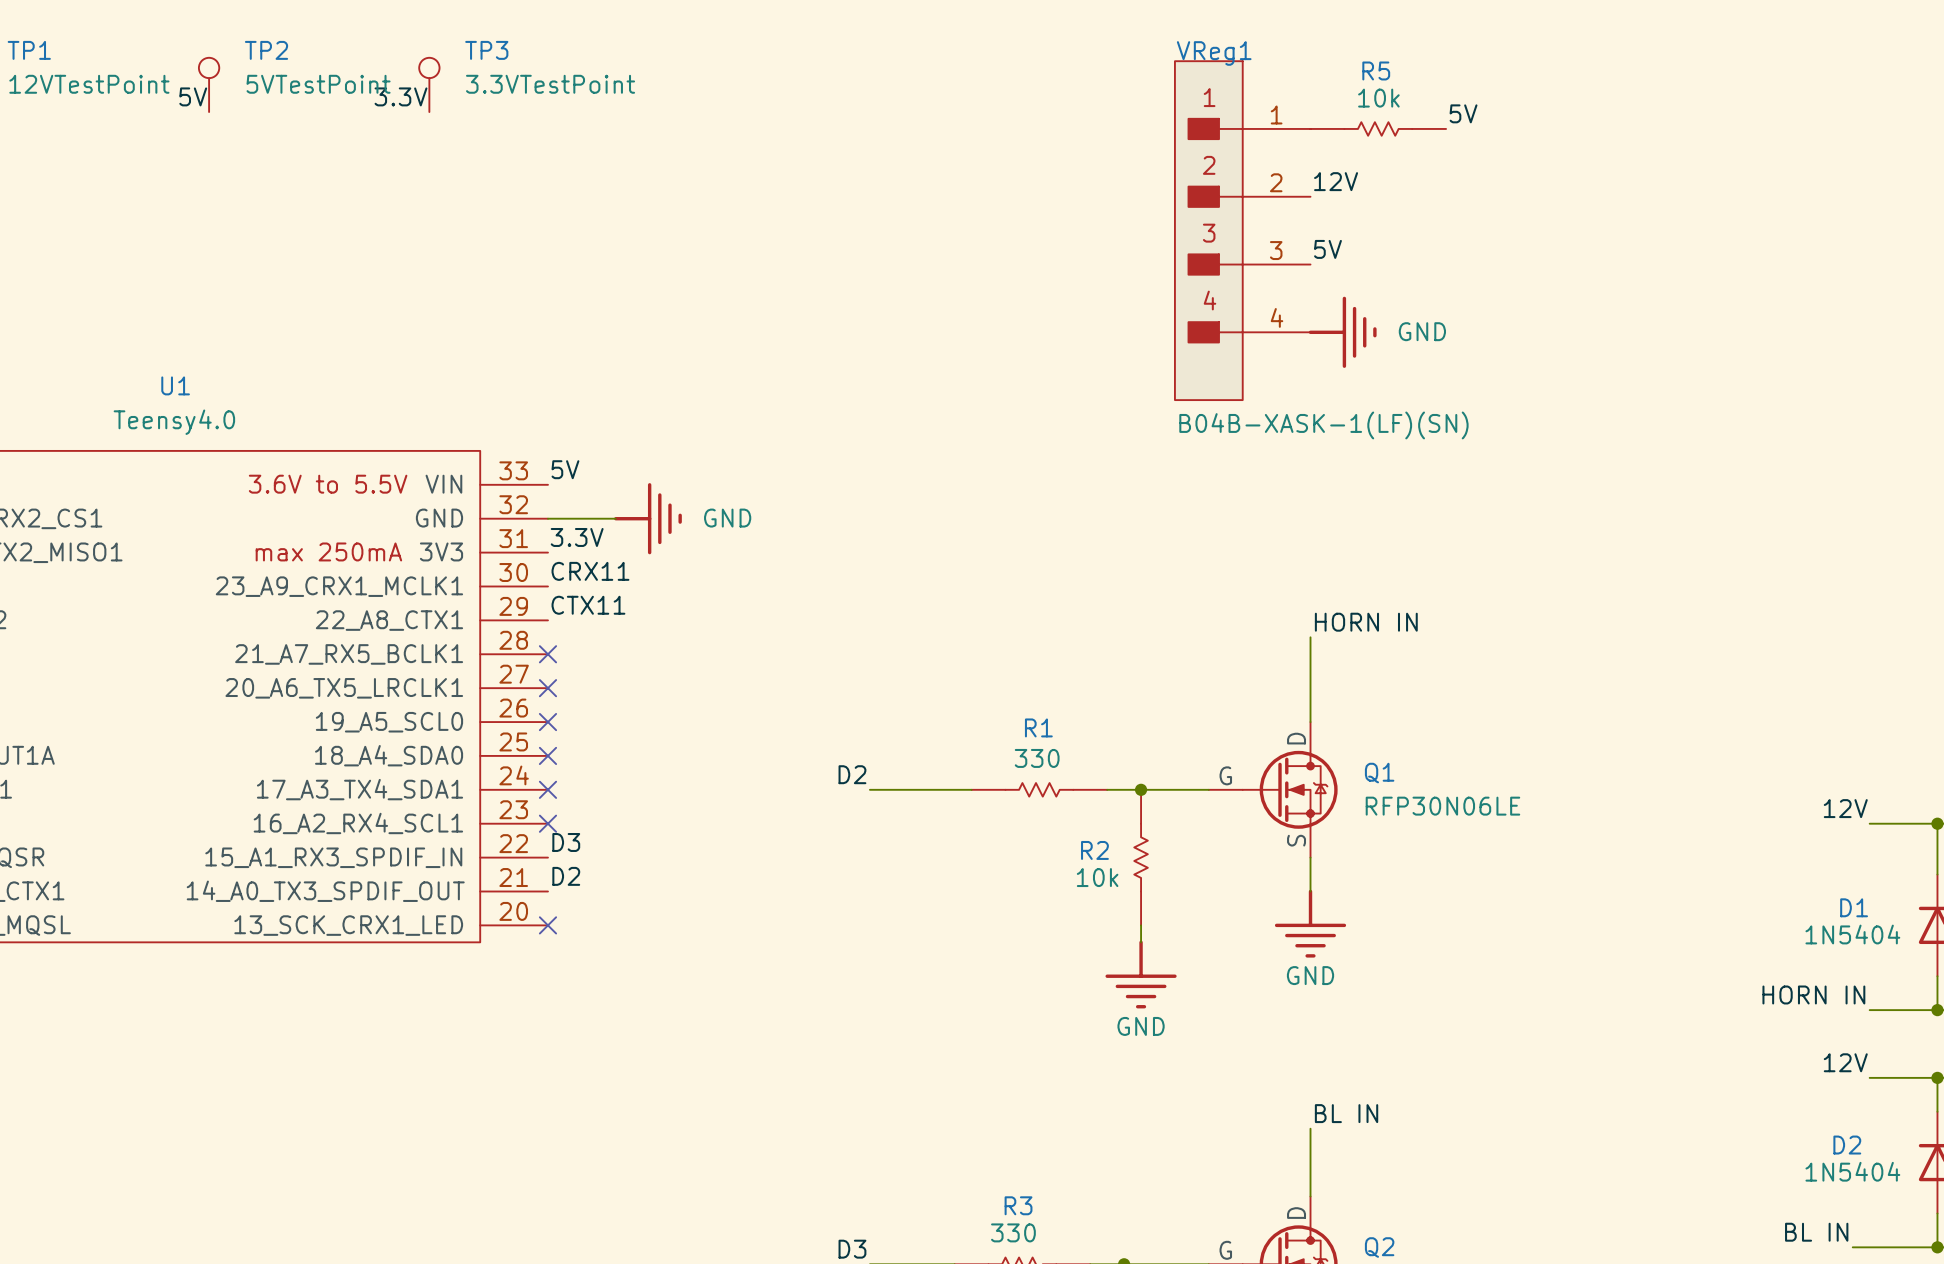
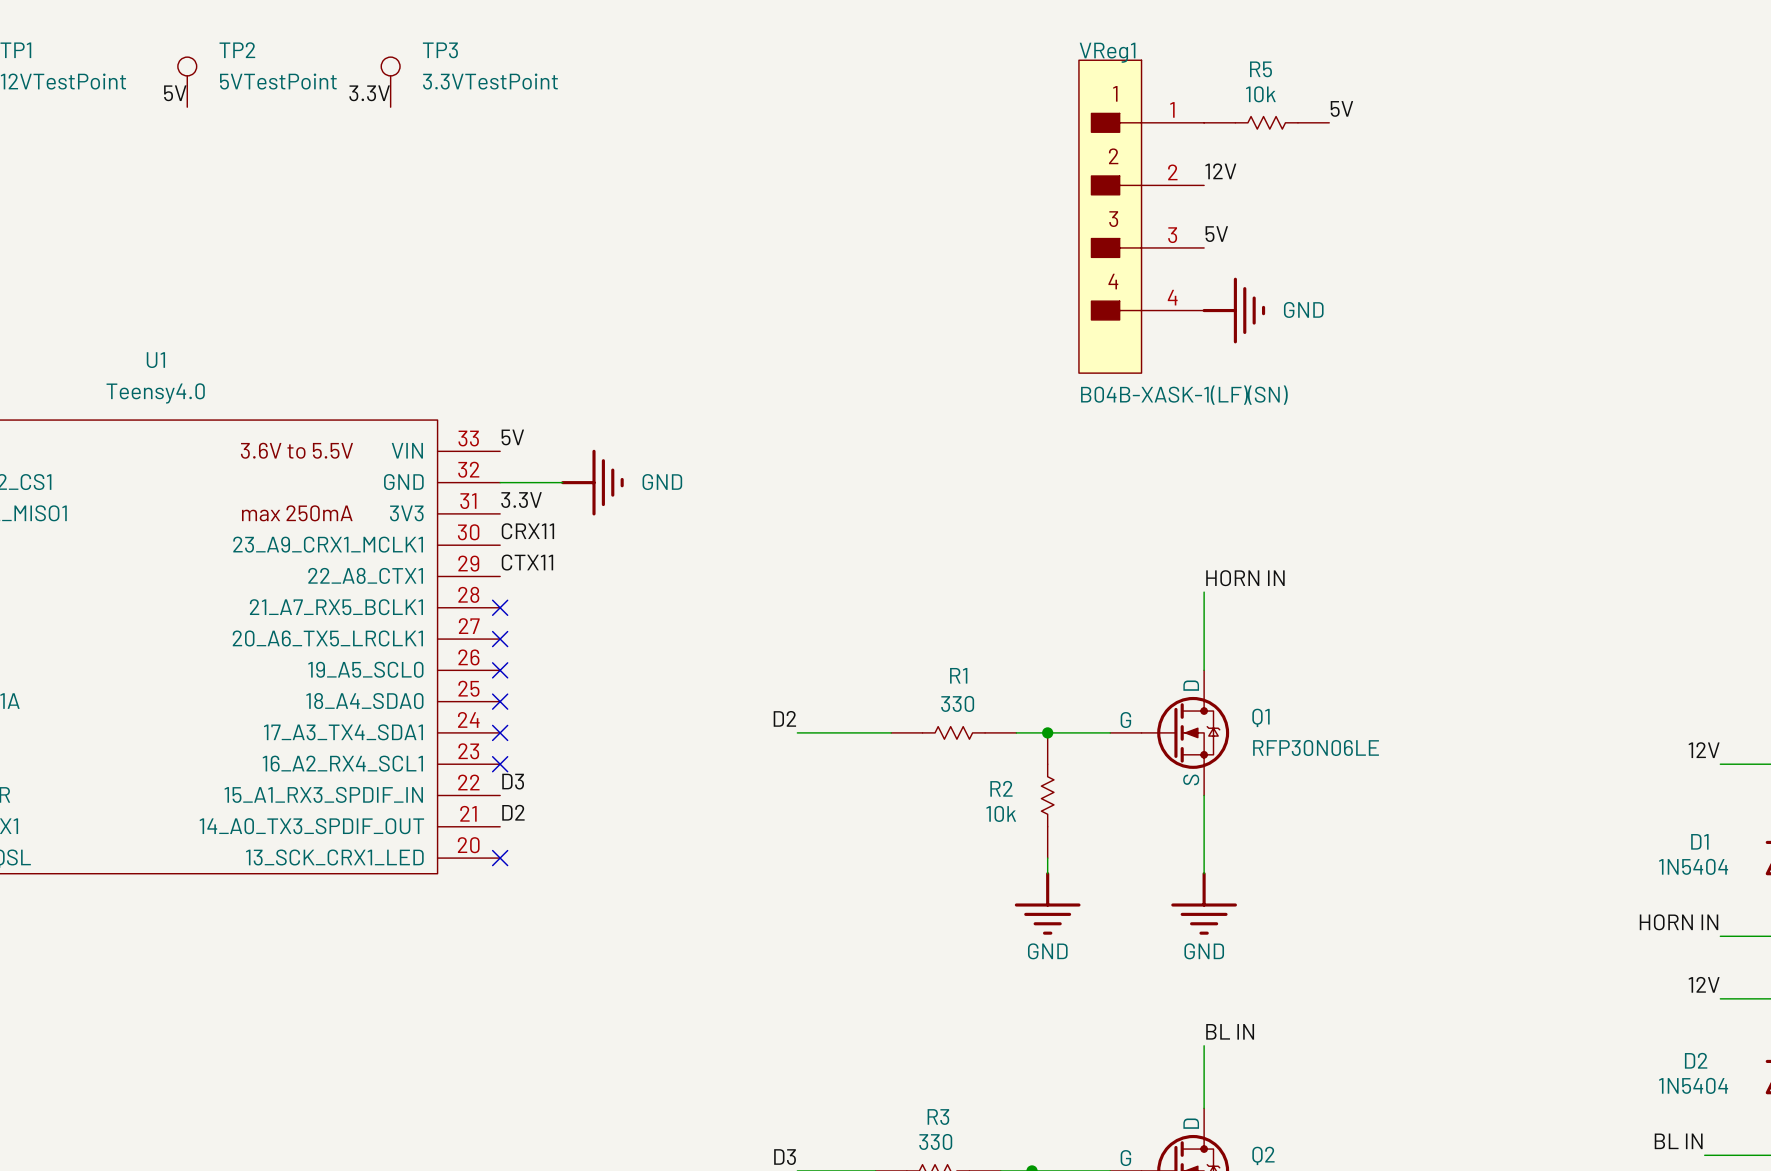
power symbol position: GND (1310, 923) -> GND (1204, 903)

